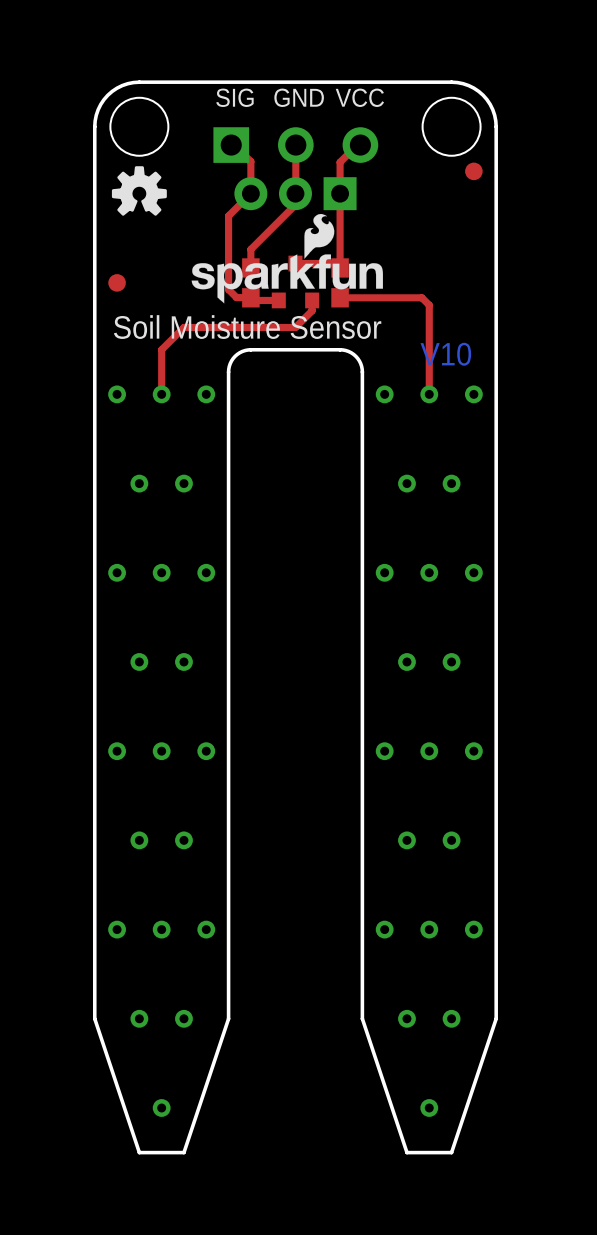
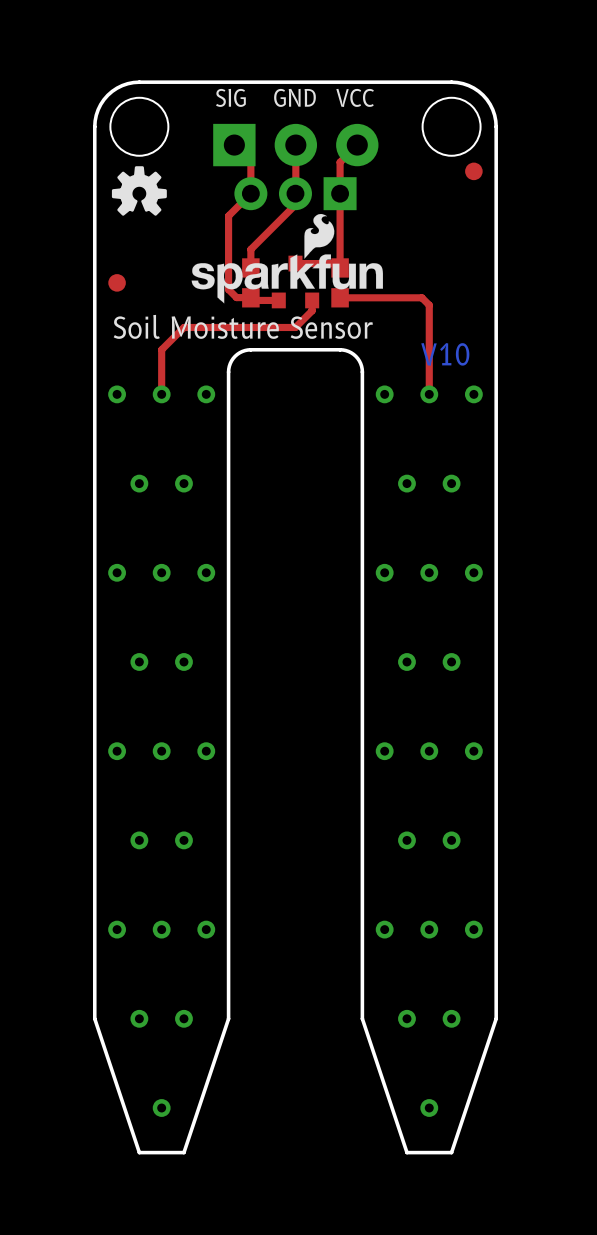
part footprint: [213, 127, 379, 163] -> [213, 123, 379, 167]

